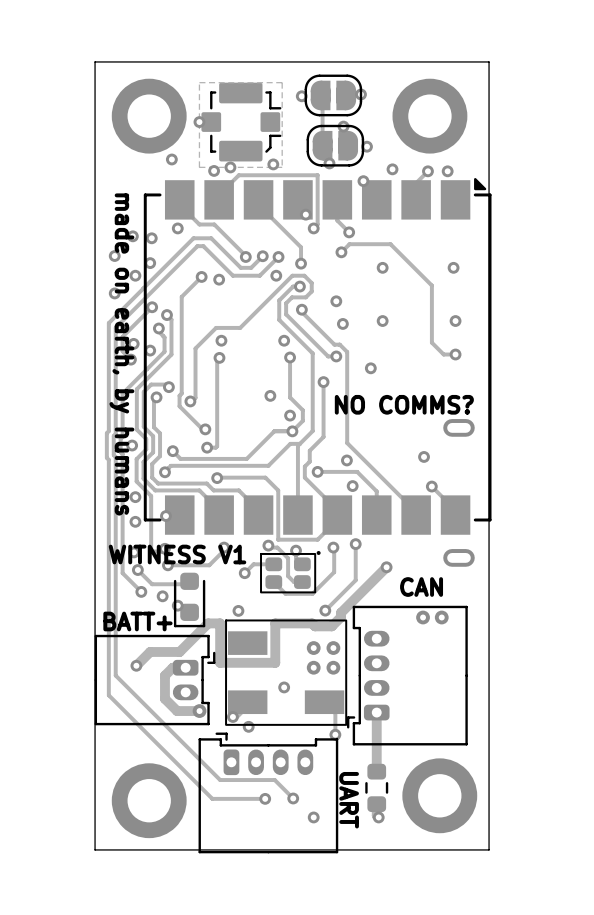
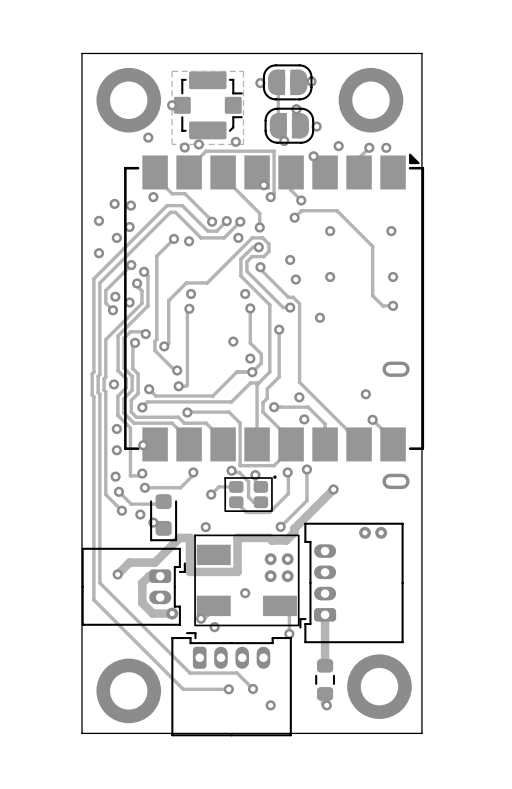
text: made on earth, by humans (121, 354) -> none
text: NO COMMS? (404, 404) -> none
text: WITNESS V1 (177, 554) -> none
text: CAN (421, 587) -> none
text: BATT+ (137, 621) -> none
text: UART (349, 800) -> none

